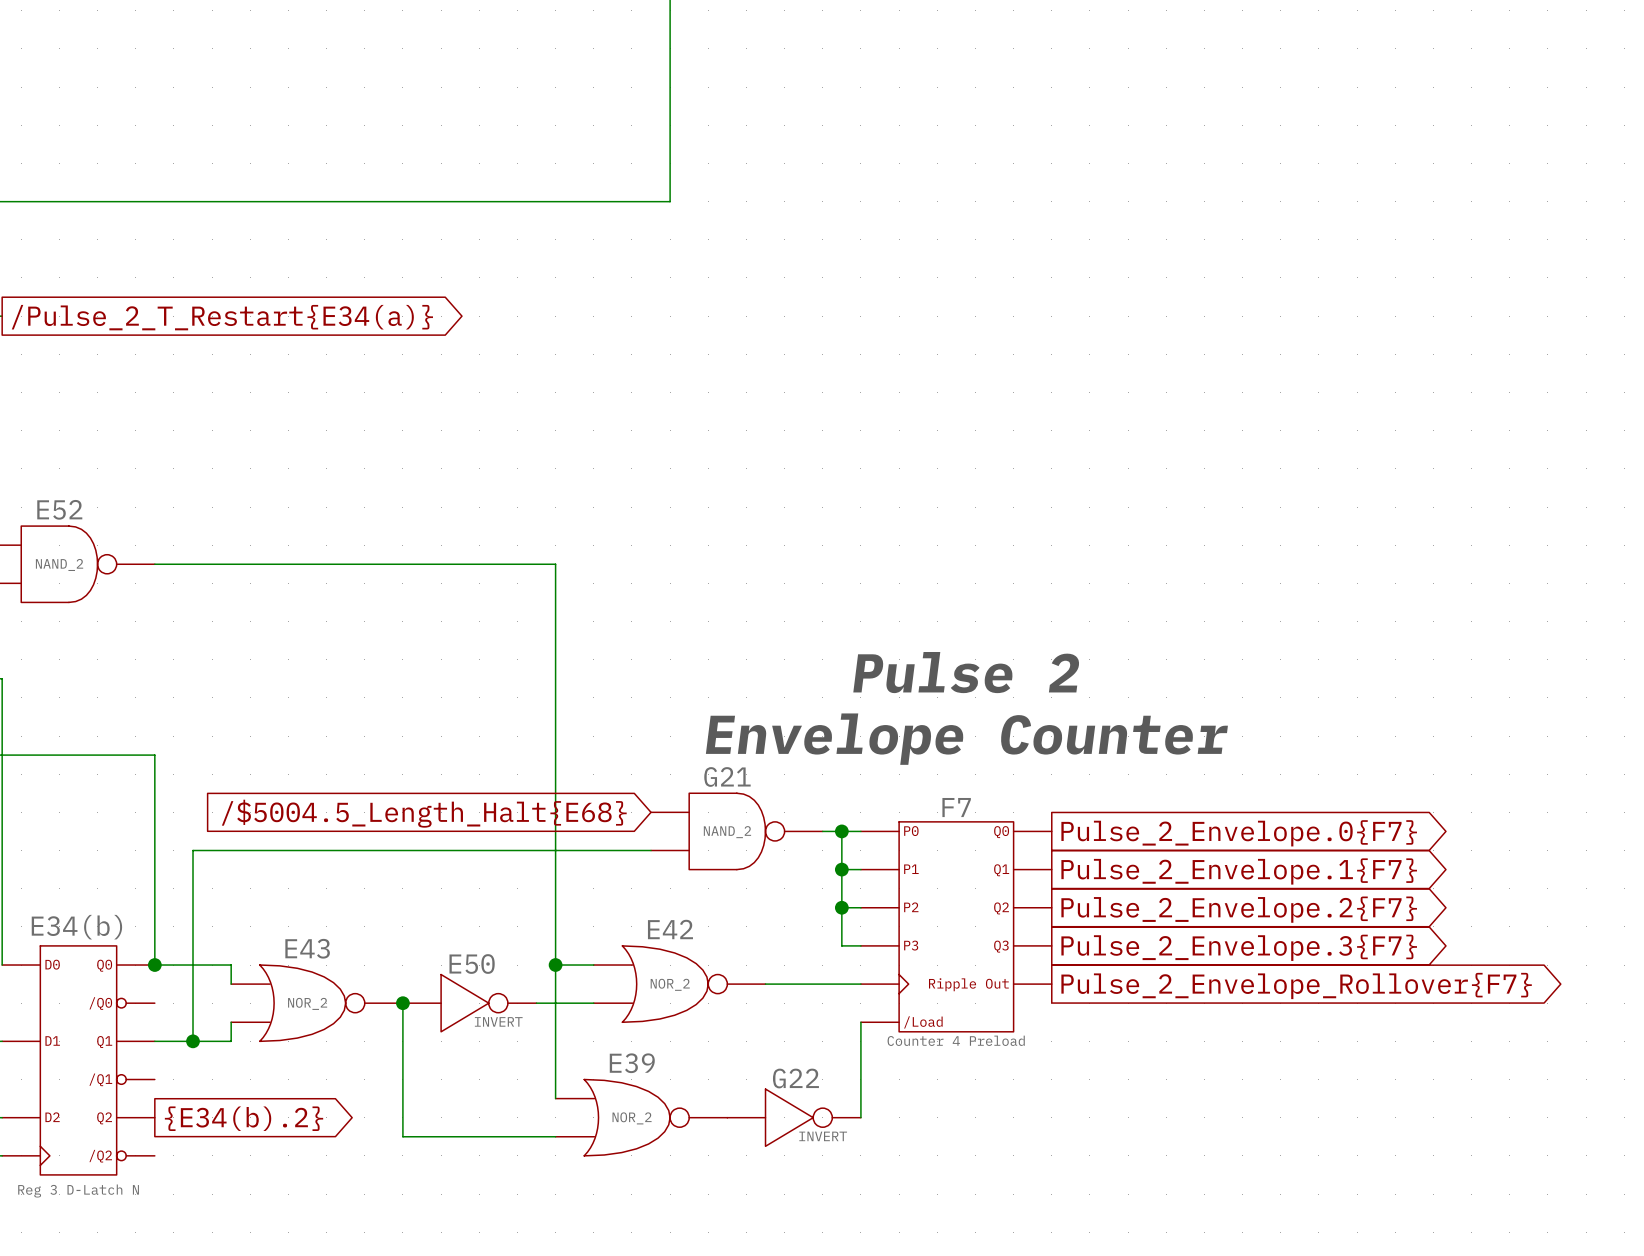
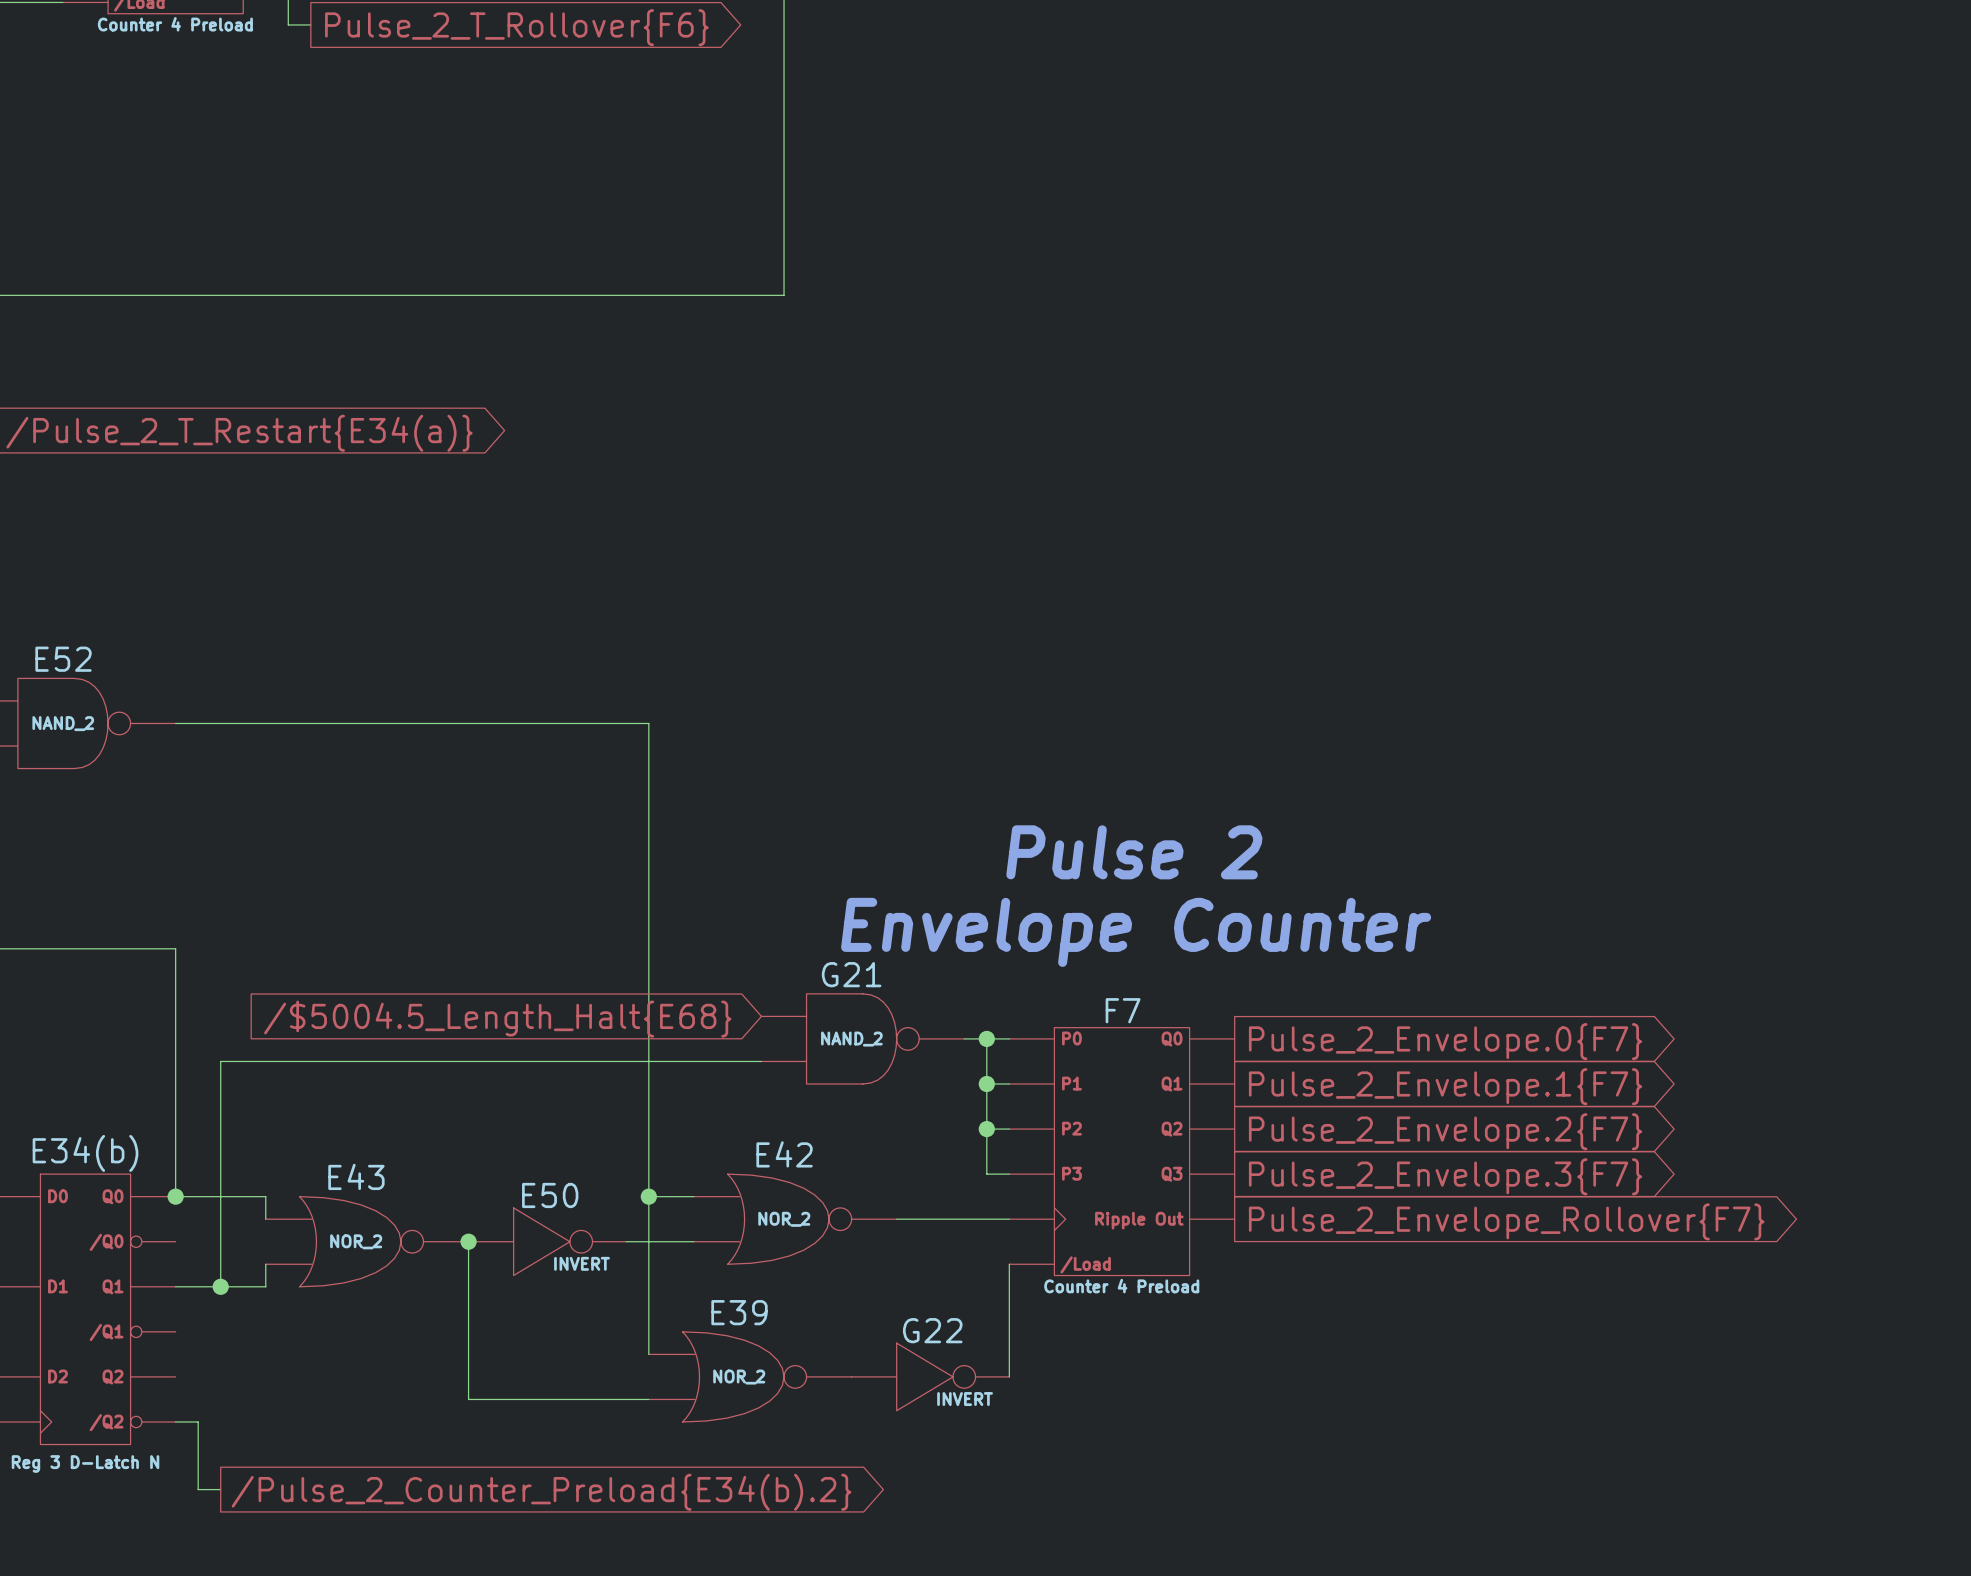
global label: {E34(b).2} (244, 1118) -> none
wire: none -> (175, 1421) (198, 1421) (198, 1489) (220, 1489)
global label: none -> /Pulse_2_Counter_Preload{E34(b).2} (541, 1492)

